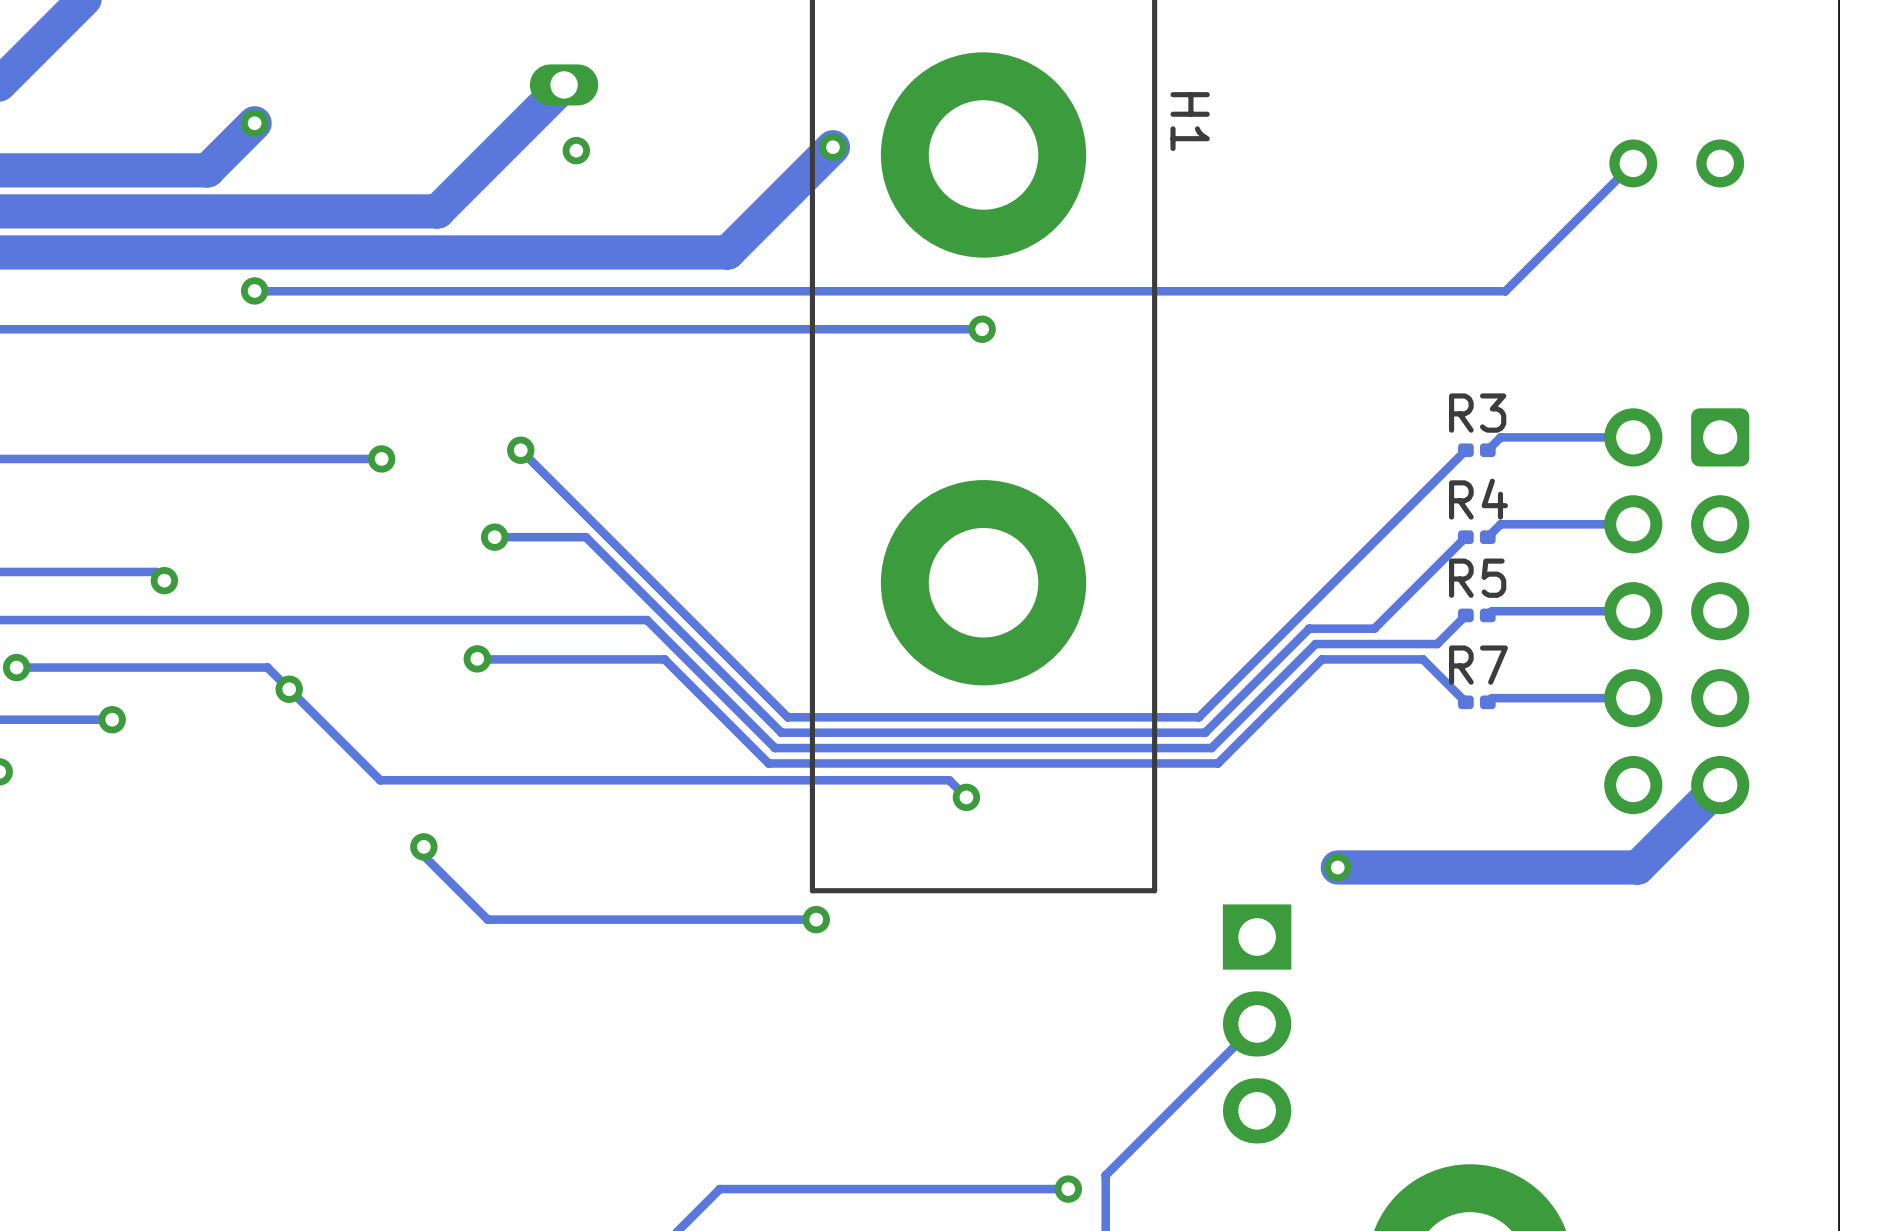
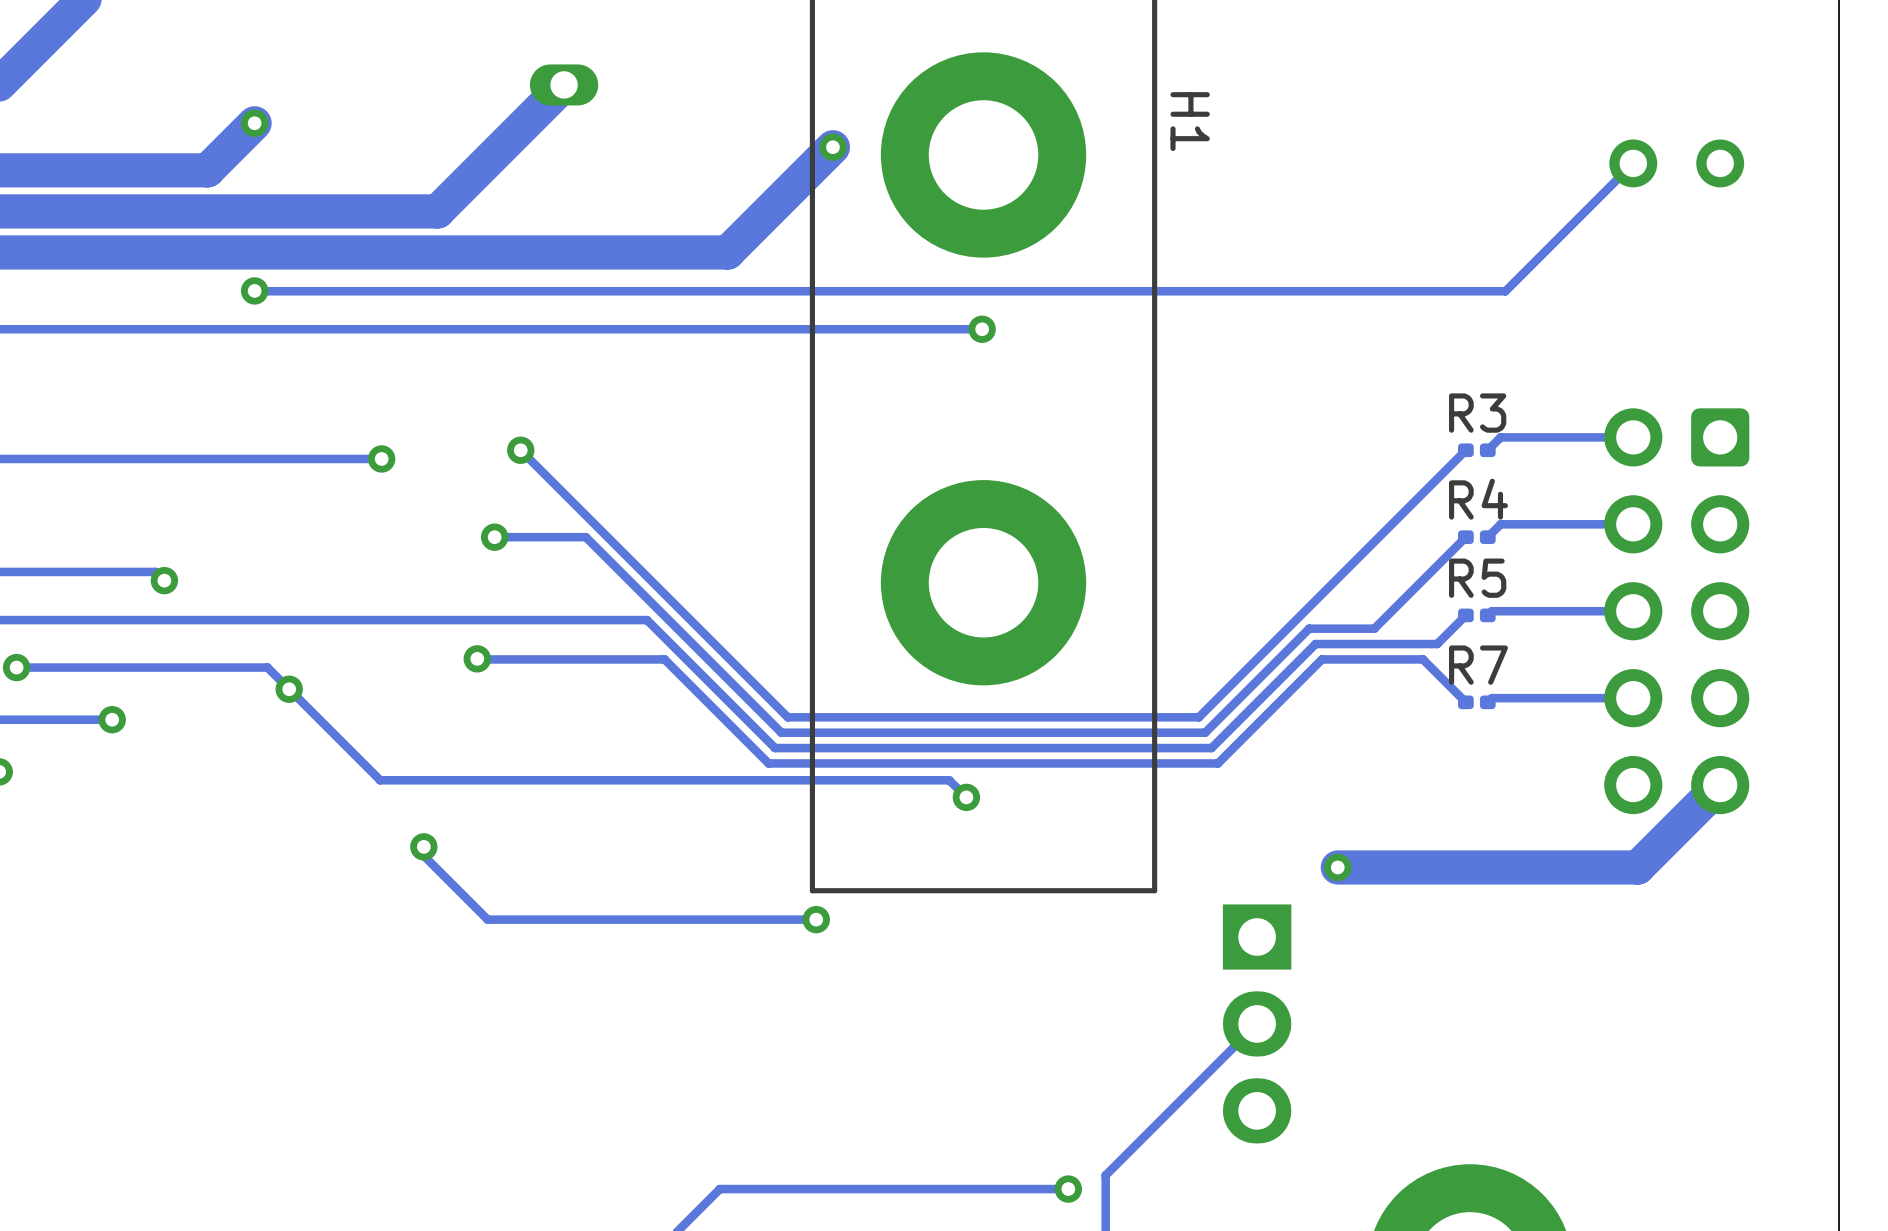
via: (576, 150) -> none

